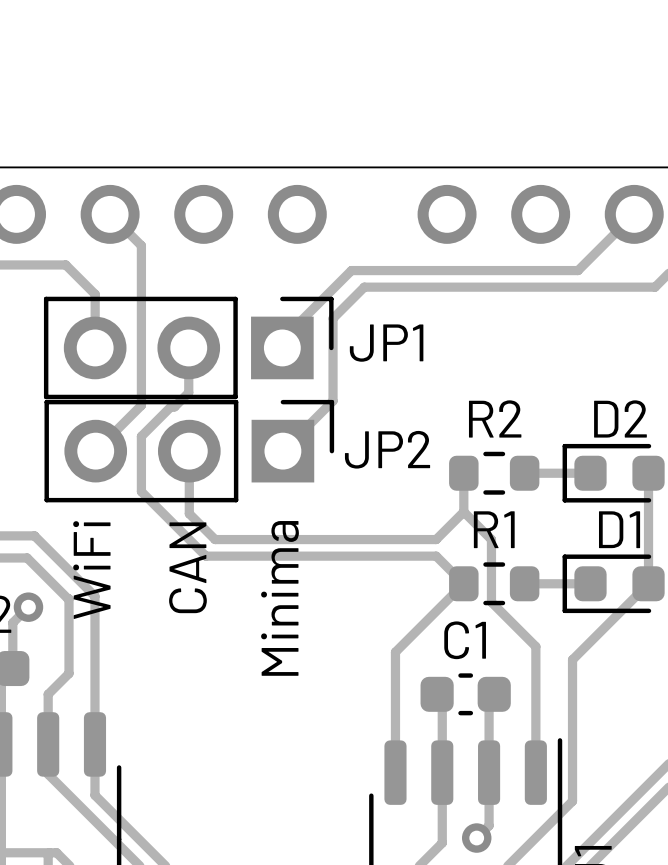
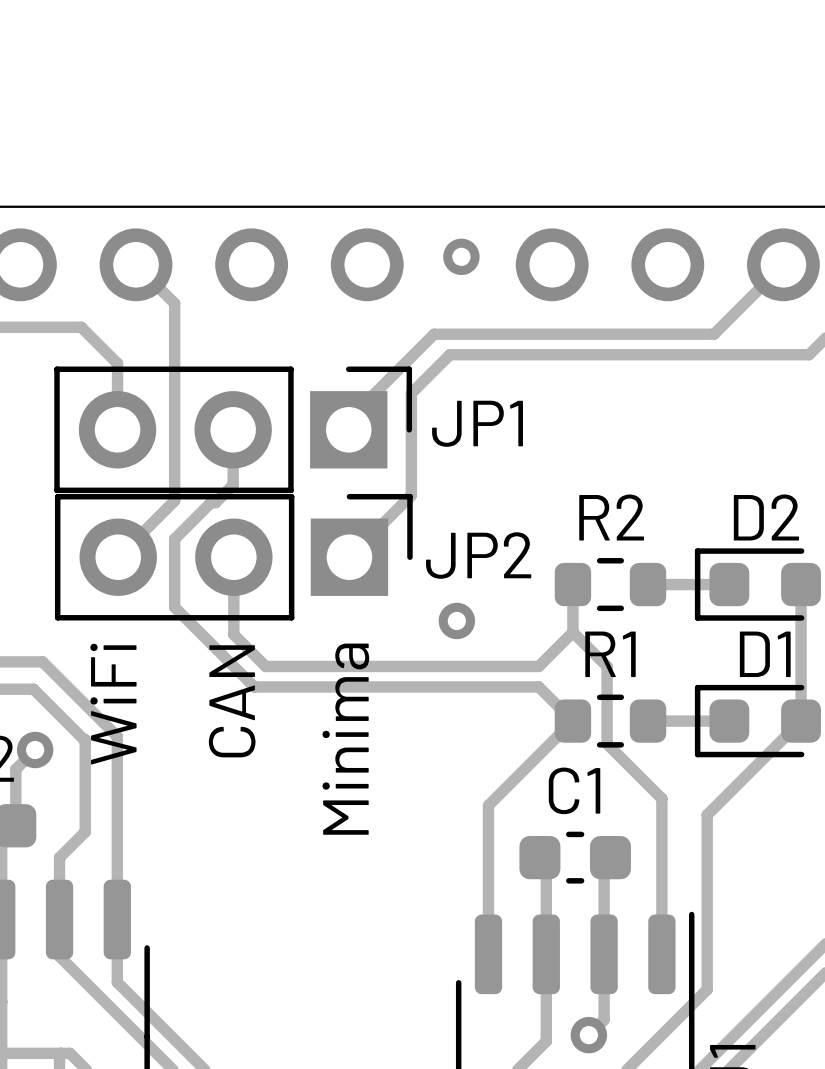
via: none -> (461, 256)
via: none -> (456, 620)

